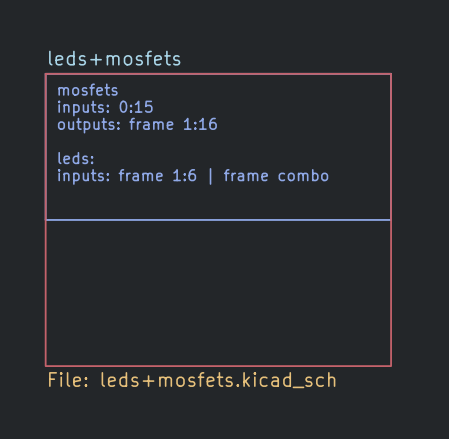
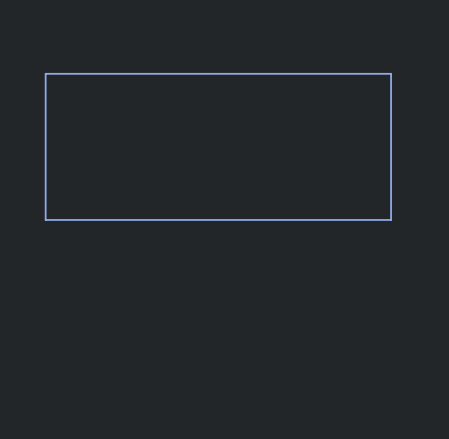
text: mosfets (88, 89) -> none
text: inputs: 0:15 (105, 108) -> none
text: outputs: frame 1:16 (137, 125) -> none
text: leds: (75, 158) -> none
text: inputs: frame 1:6 | frame combo (193, 176) -> none
sheet leds+mosfets: File: leds+mosfets.kicad_sch (218, 219) -> none

